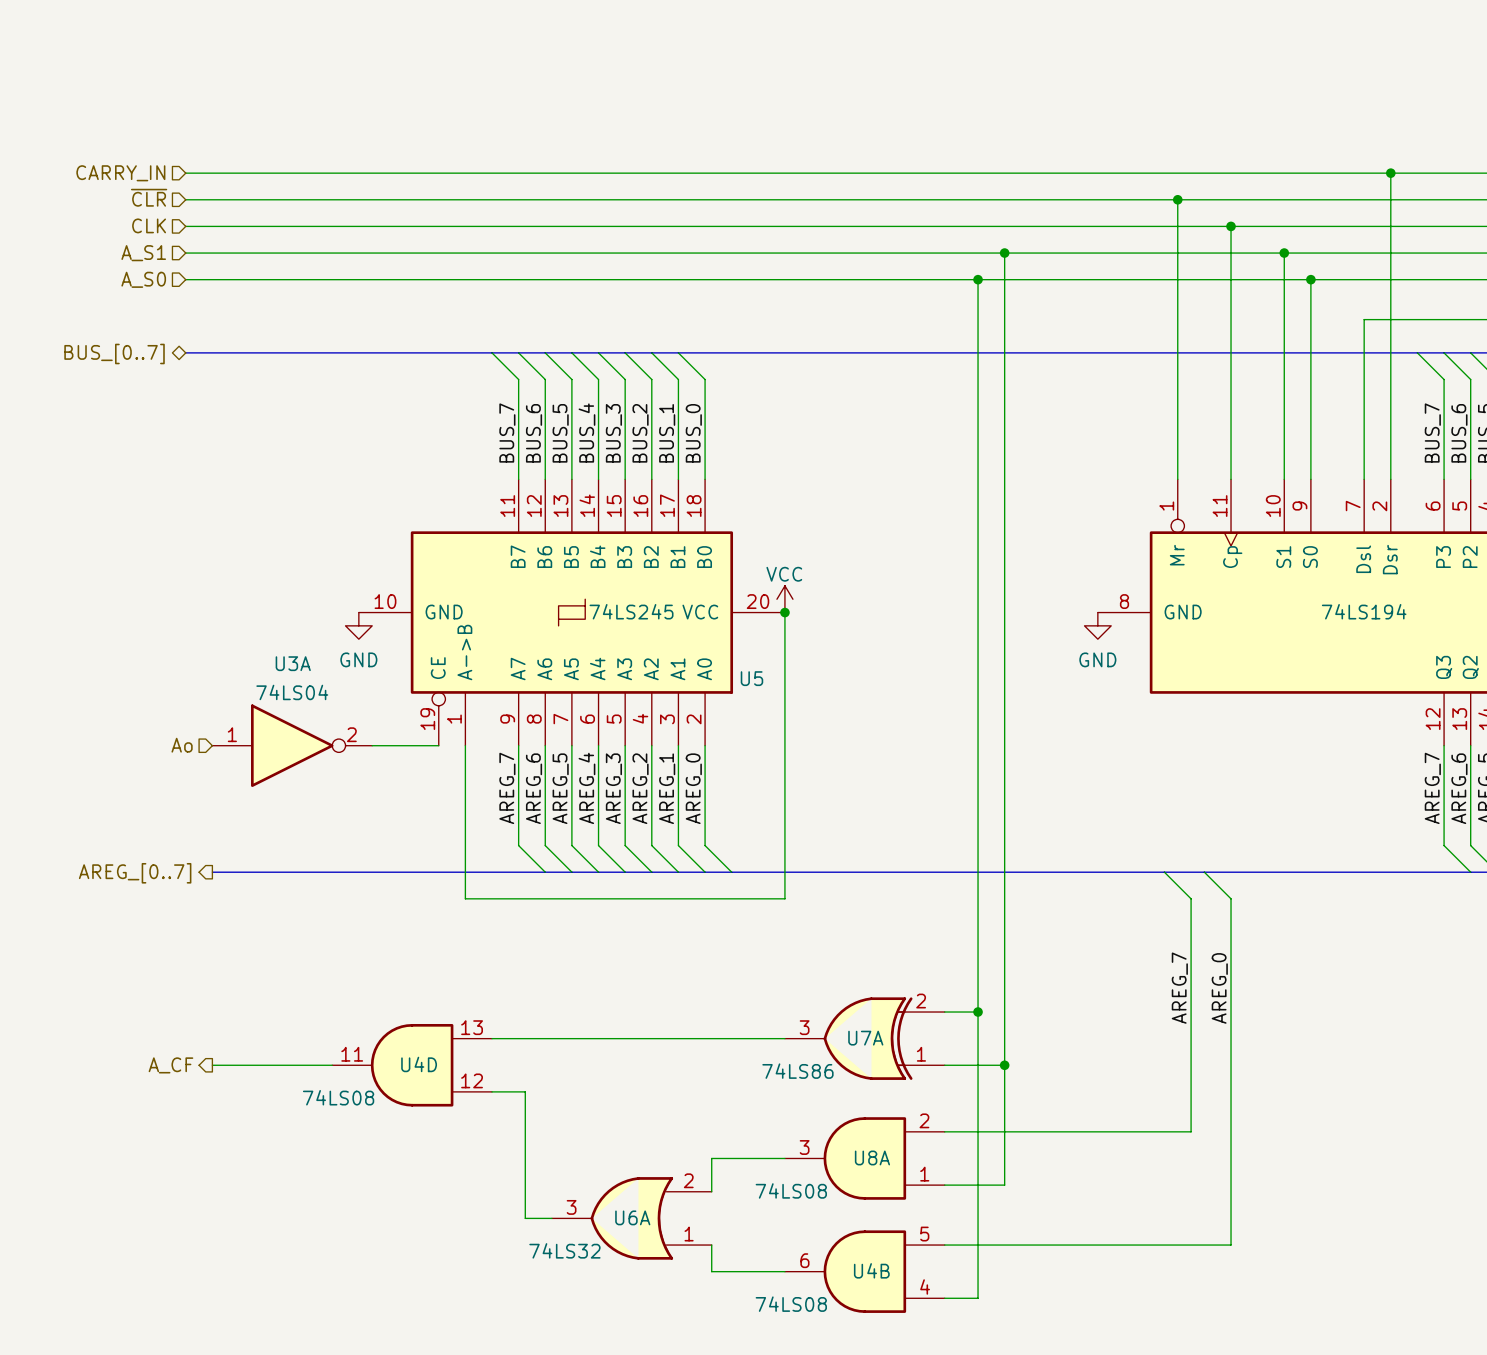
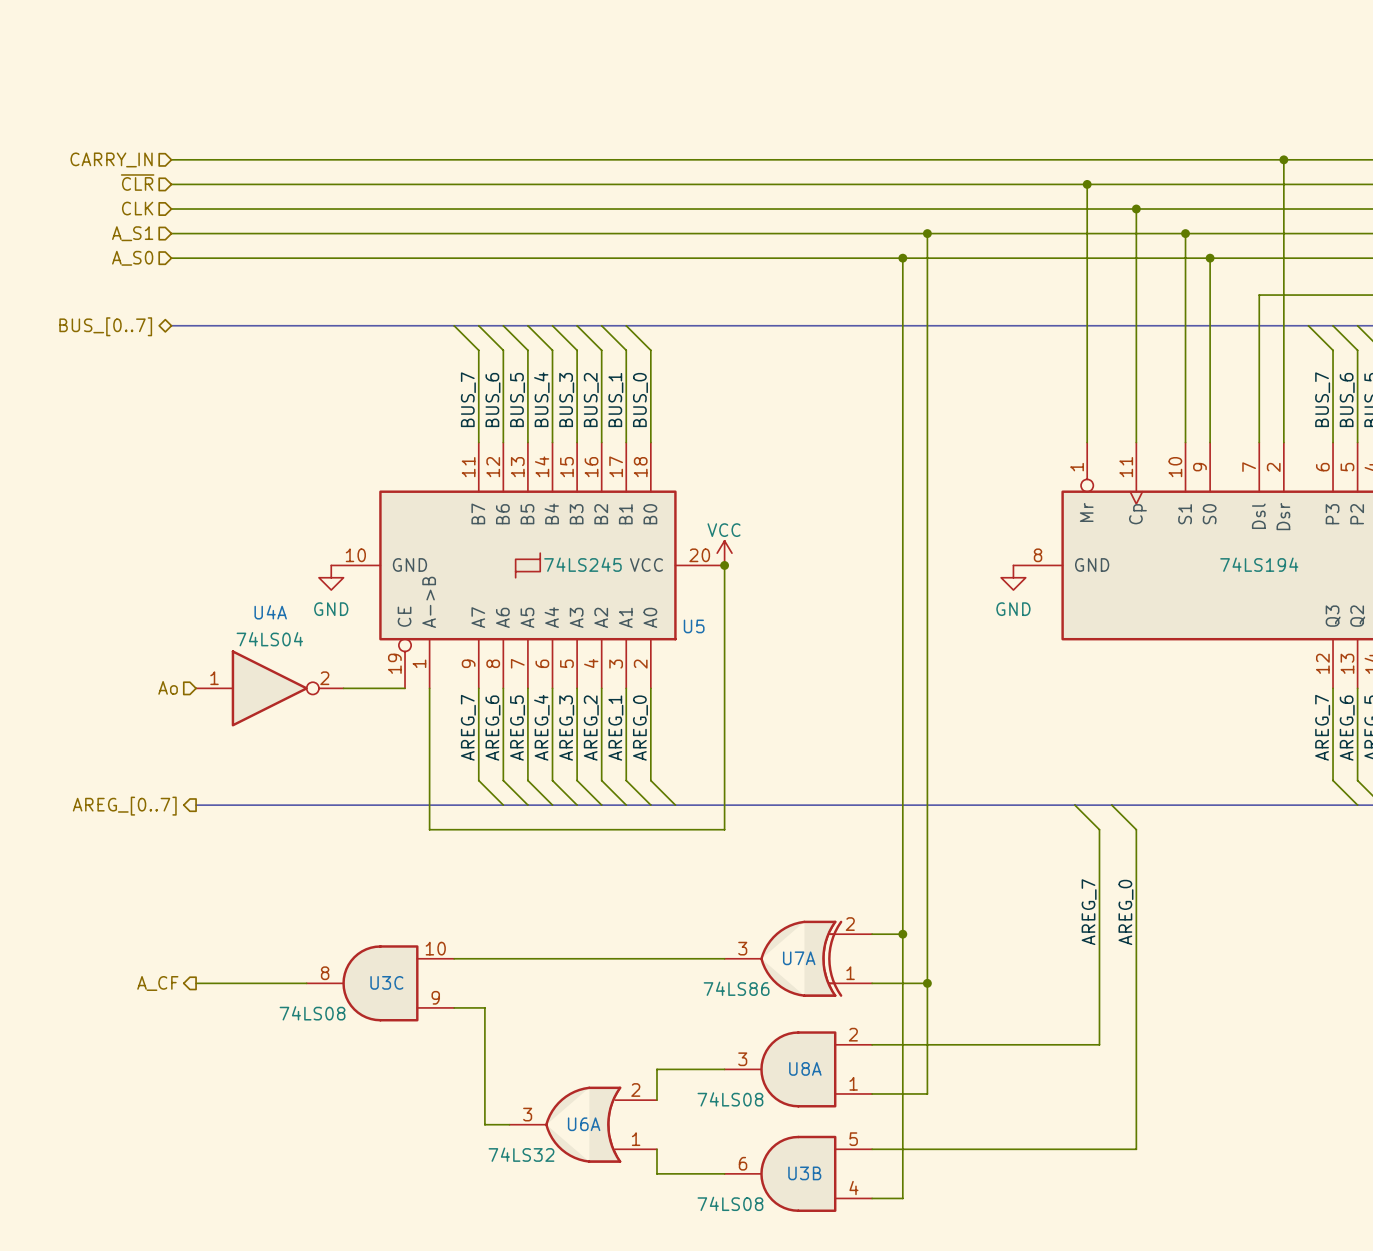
U3A name: U3A (293, 663) -> U4A (270, 612)
U4D pin number: 13 (472, 1027) -> 10 (435, 948)
U4D pin number: 11 (352, 1054) -> 8 (325, 973)
U4D name: U4D (419, 1064) -> U3C (386, 982)
U4D pin number: 12 (472, 1080) -> 9 (435, 997)
U4B name: U4B (871, 1270) -> U3B (804, 1173)

